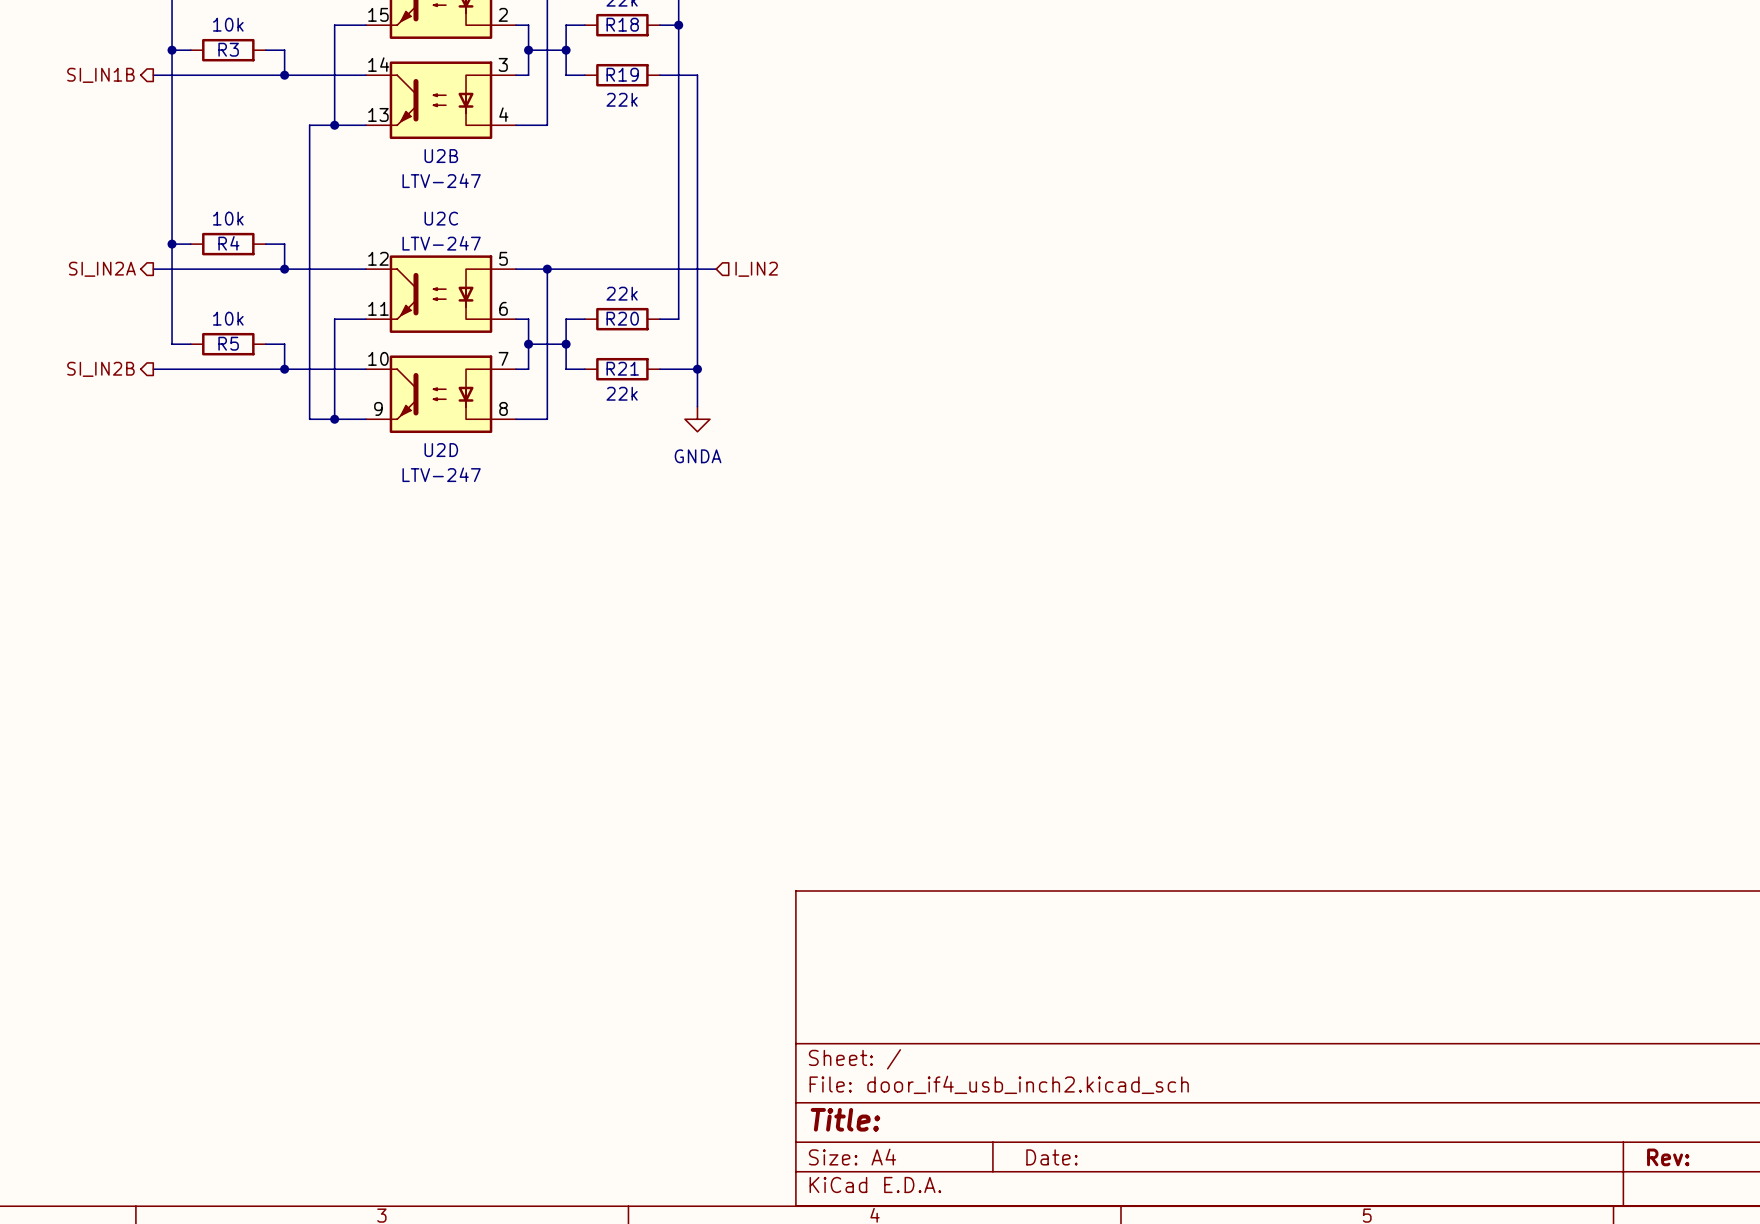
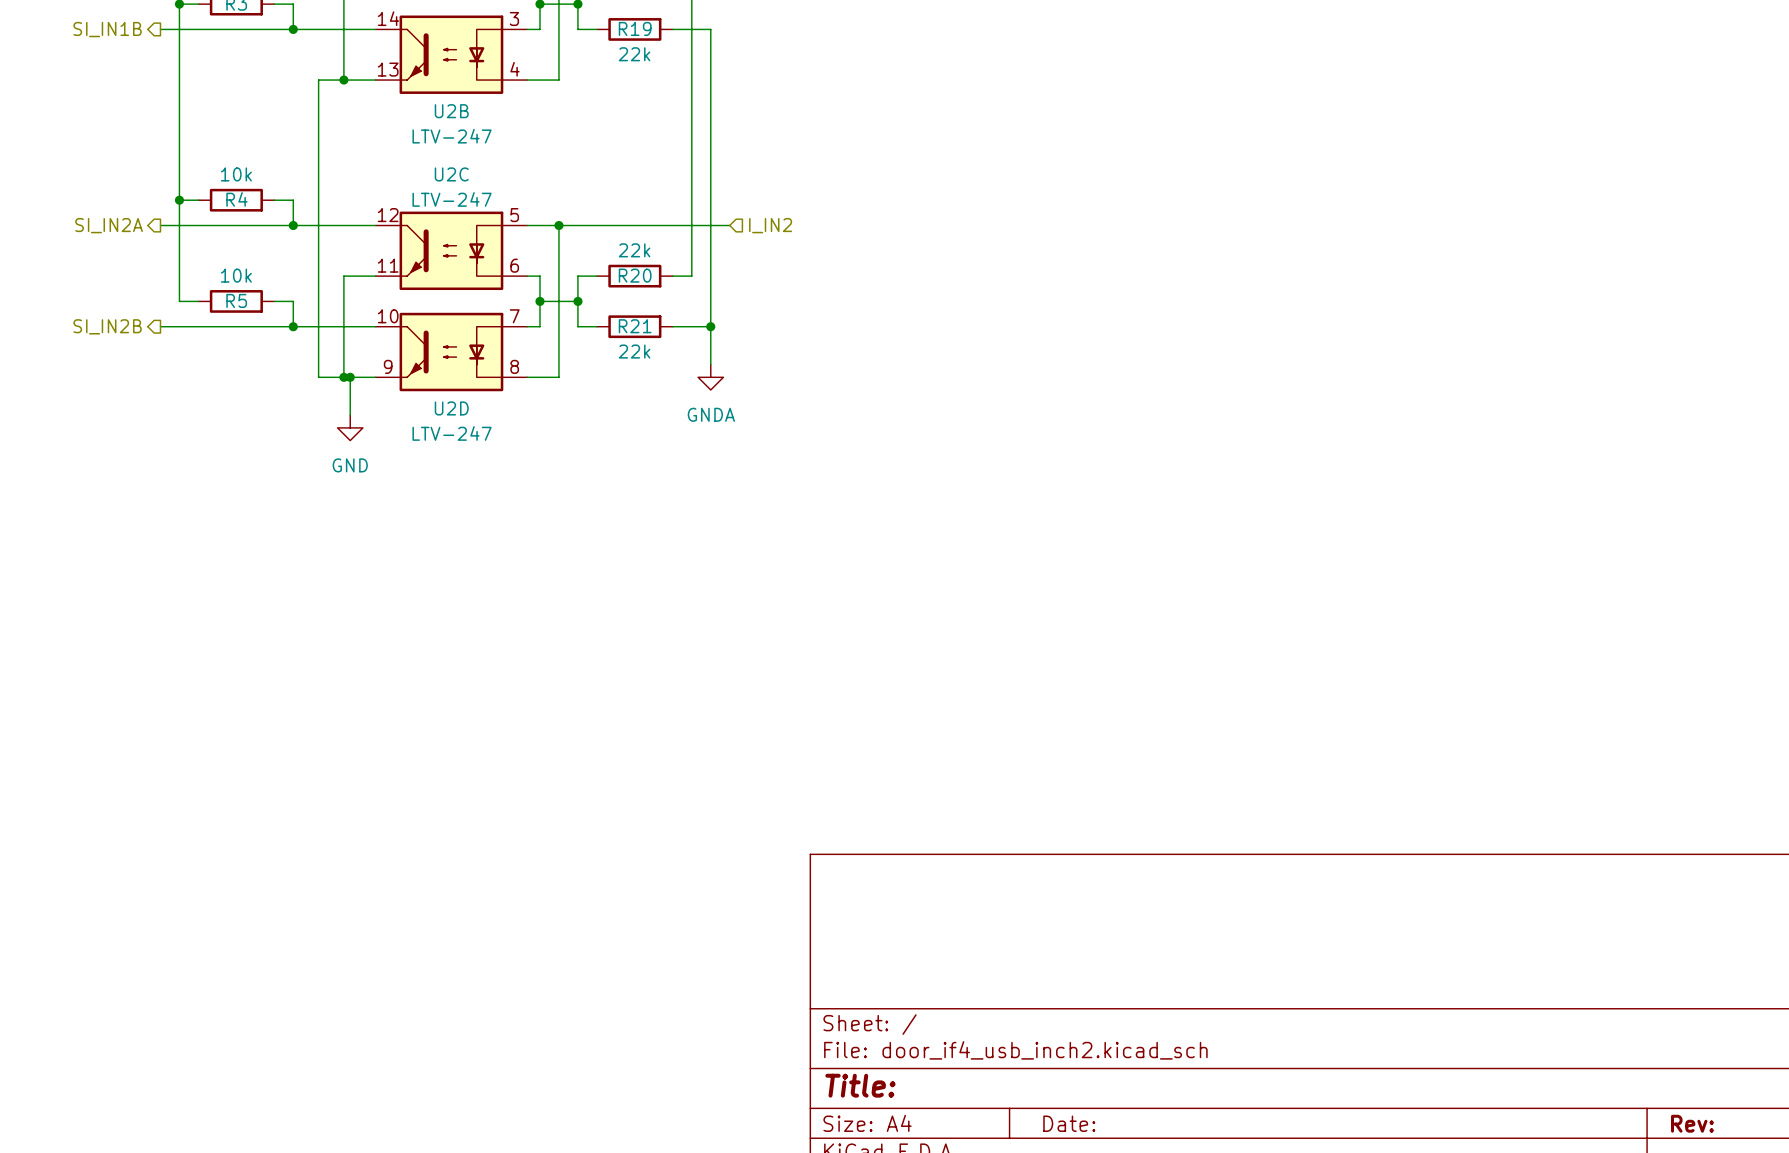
wire: none -> (350, 377) (350, 415)
junction: none -> (350, 377)
power symbol: none -> GND (350, 427)

